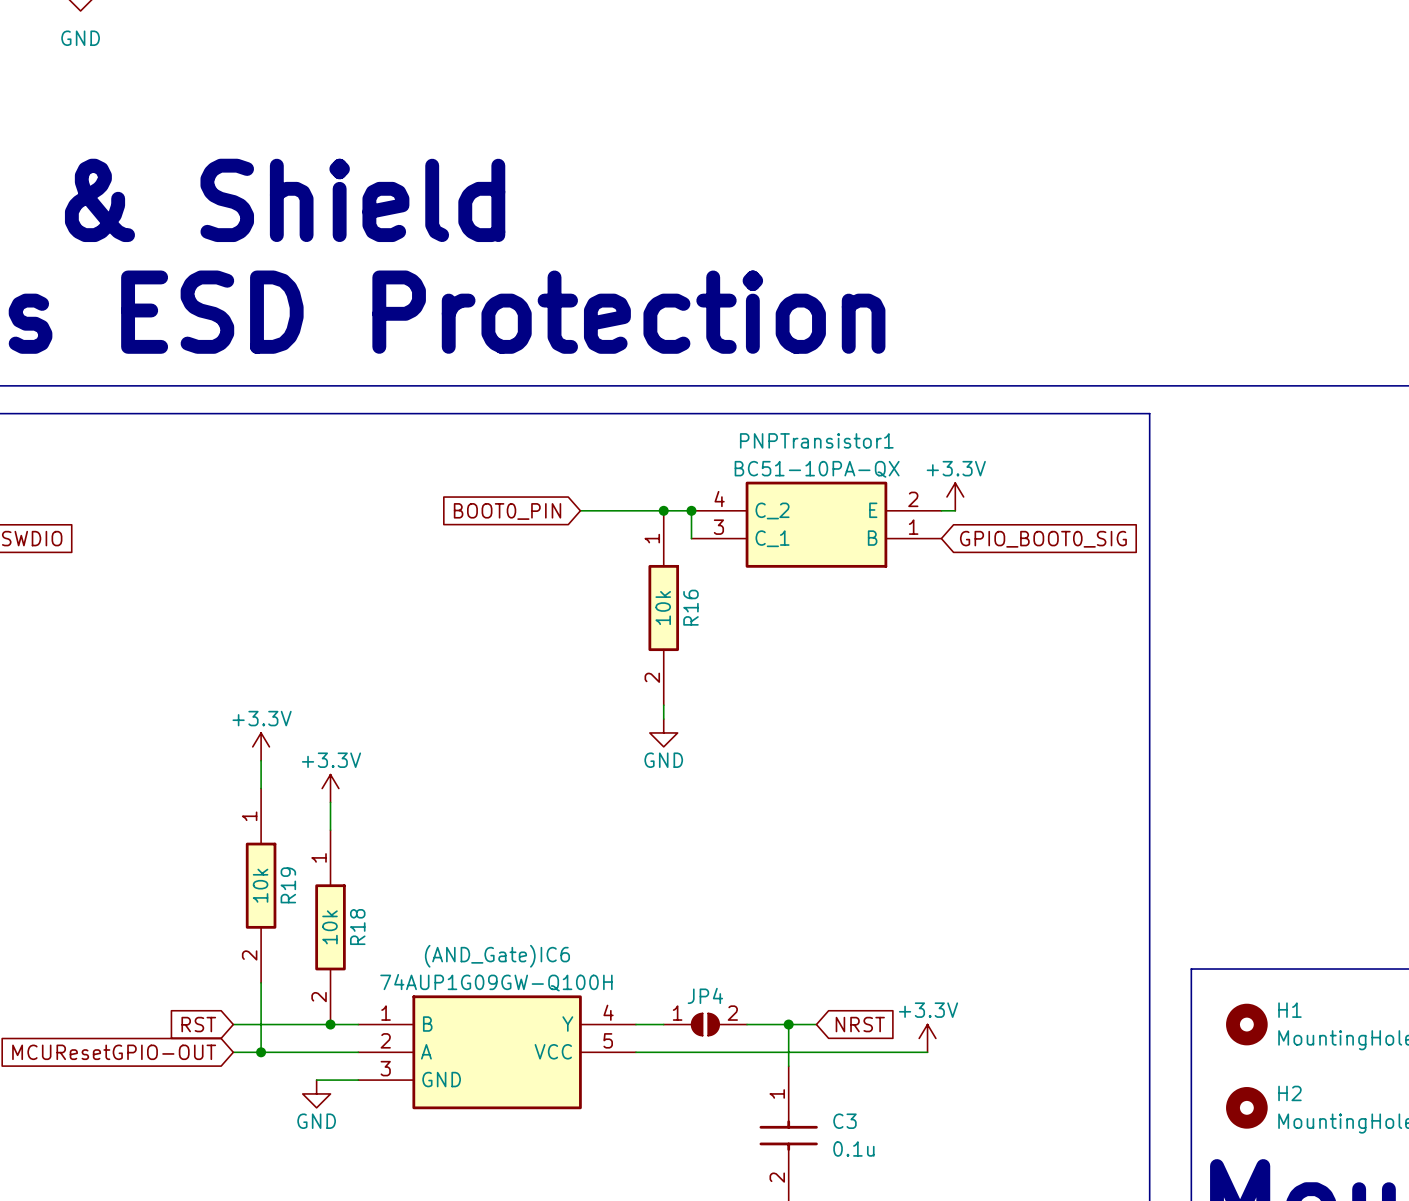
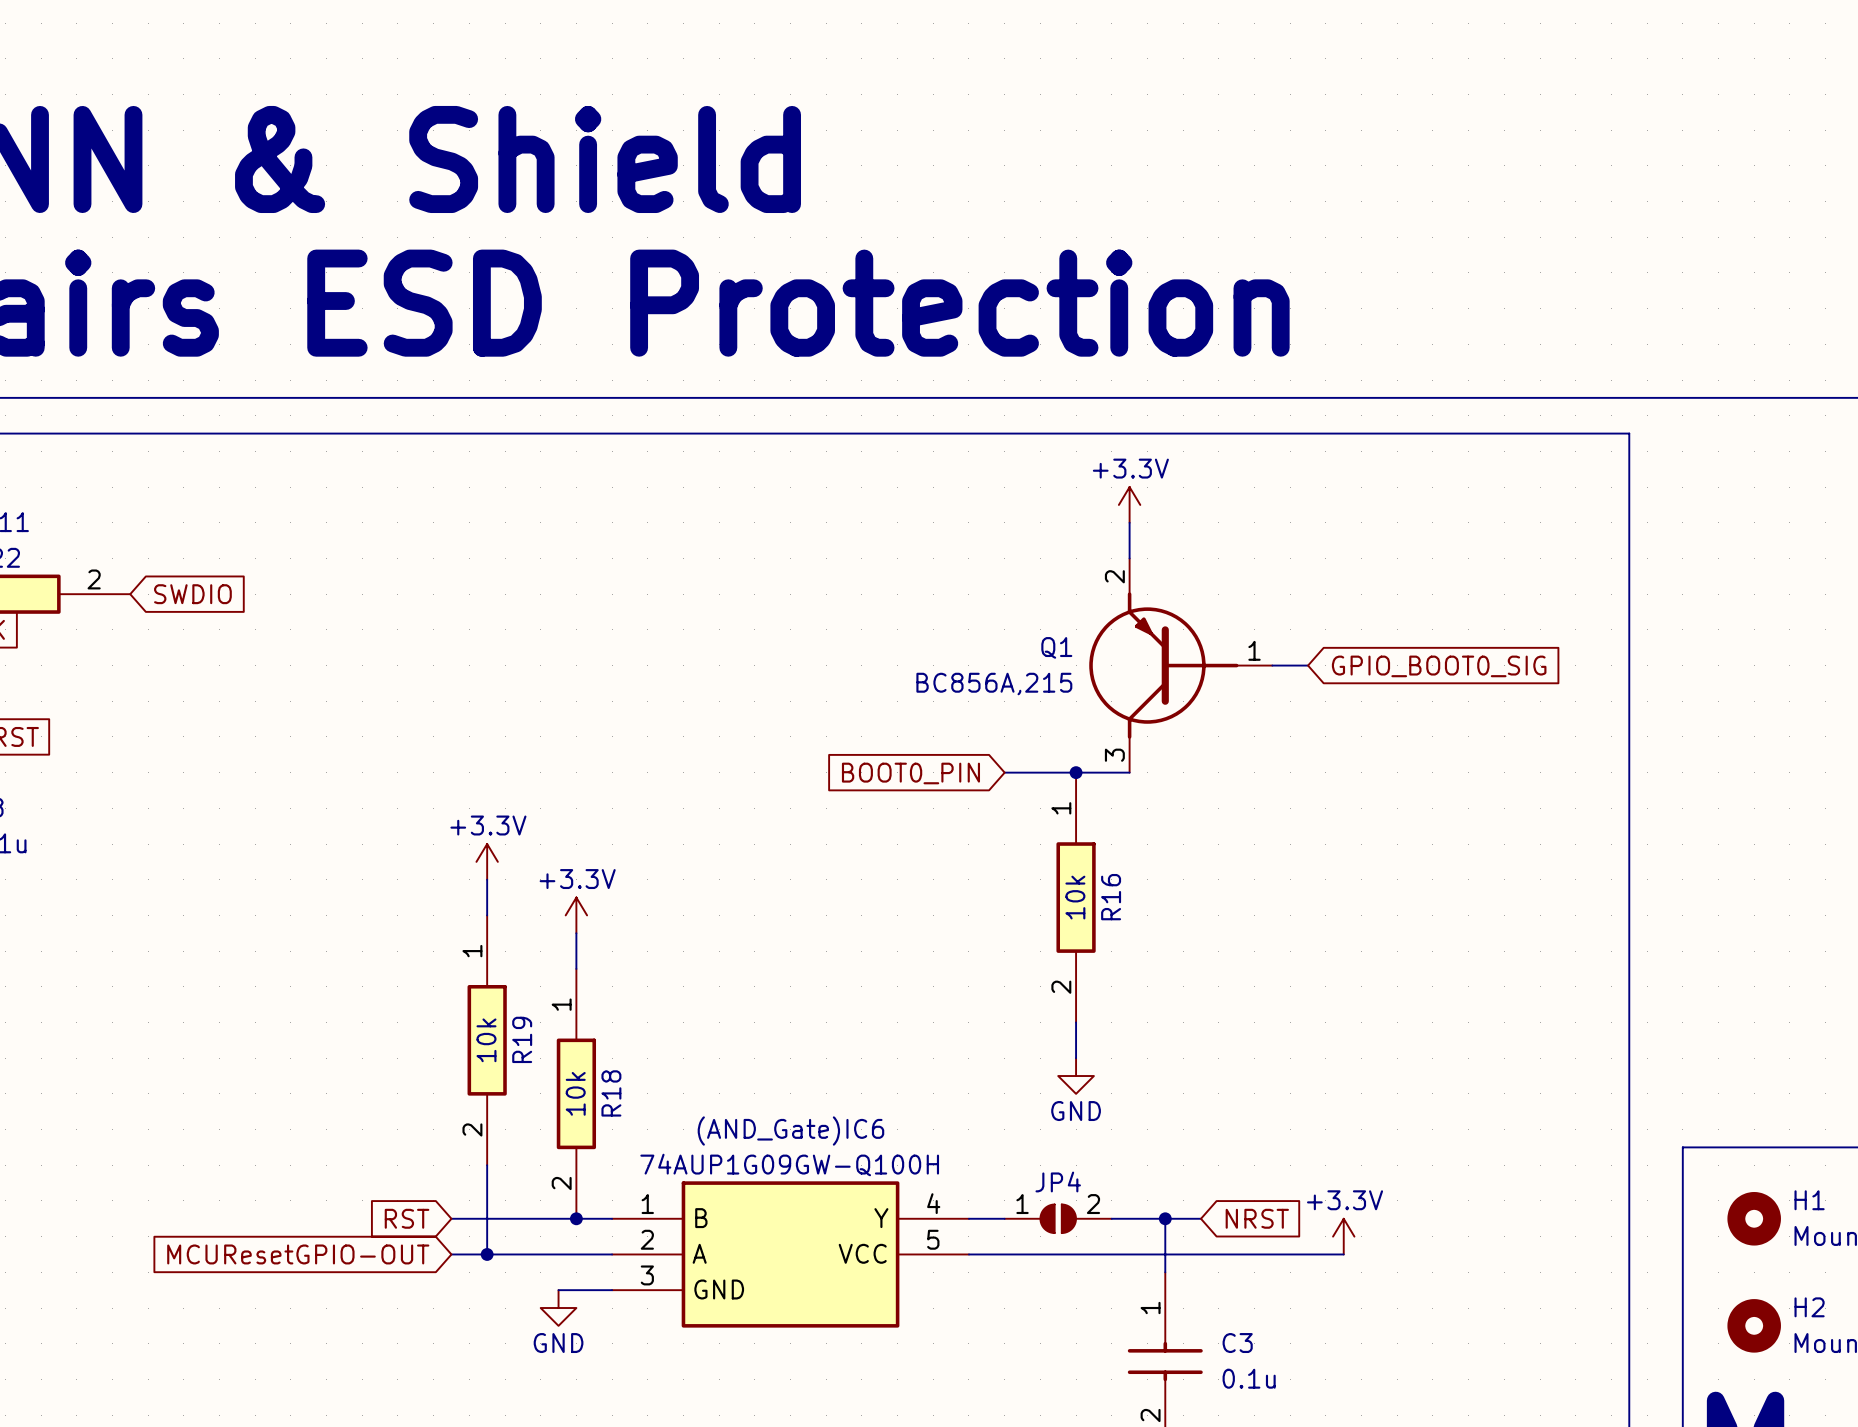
power symbol position: +3.3V (955, 496) -> +3.3V (1129, 504)
wire: (580, 510) (691, 510) (691, 538) -> none
junction: (663, 510) -> none
junction: (691, 510) -> none
wire: (941, 510) (955, 510) -> none
global label position: BOOT0_PIN (507, 511) -> BOOT0_PIN (910, 773)
PNPTransistor1: BC51-10PA-QX (816, 524) -> none
global label position: GPIO_BOOT0_SIG (1043, 539) -> GPIO_BOOT0_SIG (1439, 666)
Q1: none -> BC856A,215 (1180, 665)
wire: none -> (1272, 665) (1308, 665)
R16 position: (663, 608) -> (1076, 897)
wire: none -> (1004, 772) (1129, 772)
junction: none -> (1076, 772)
wire: (663, 705) (663, 719) -> none
power symbol position: GND (663, 732) -> GND (1076, 1076)
wire: none -> (1076, 1022) (1076, 1058)

